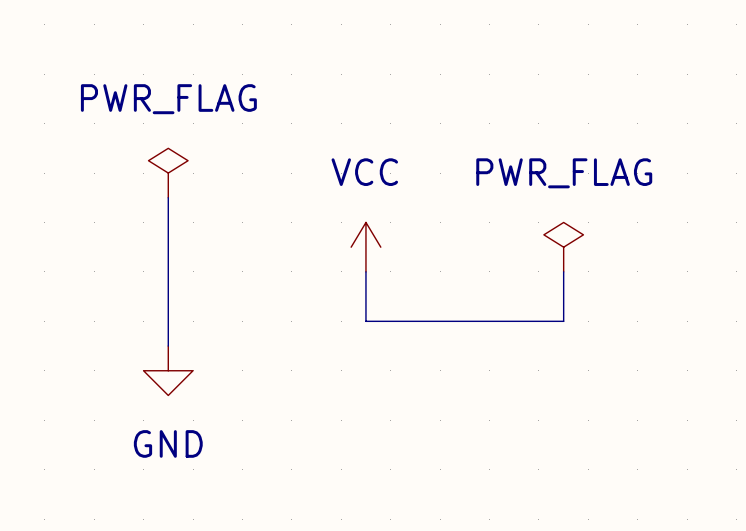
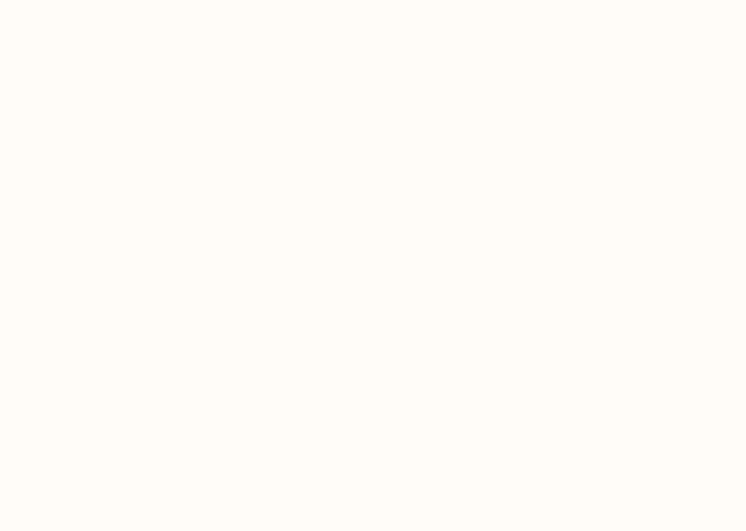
power symbol: PWR_FLAG (168, 173) -> none
wire: (168, 197) (168, 346) -> none
power symbol: VCC (365, 247) -> none
power symbol: PWR_FLAG (563, 247) -> none
wire: (365, 271) (365, 321) (563, 321) (563, 271) -> none
power symbol: GND (168, 370) -> none

